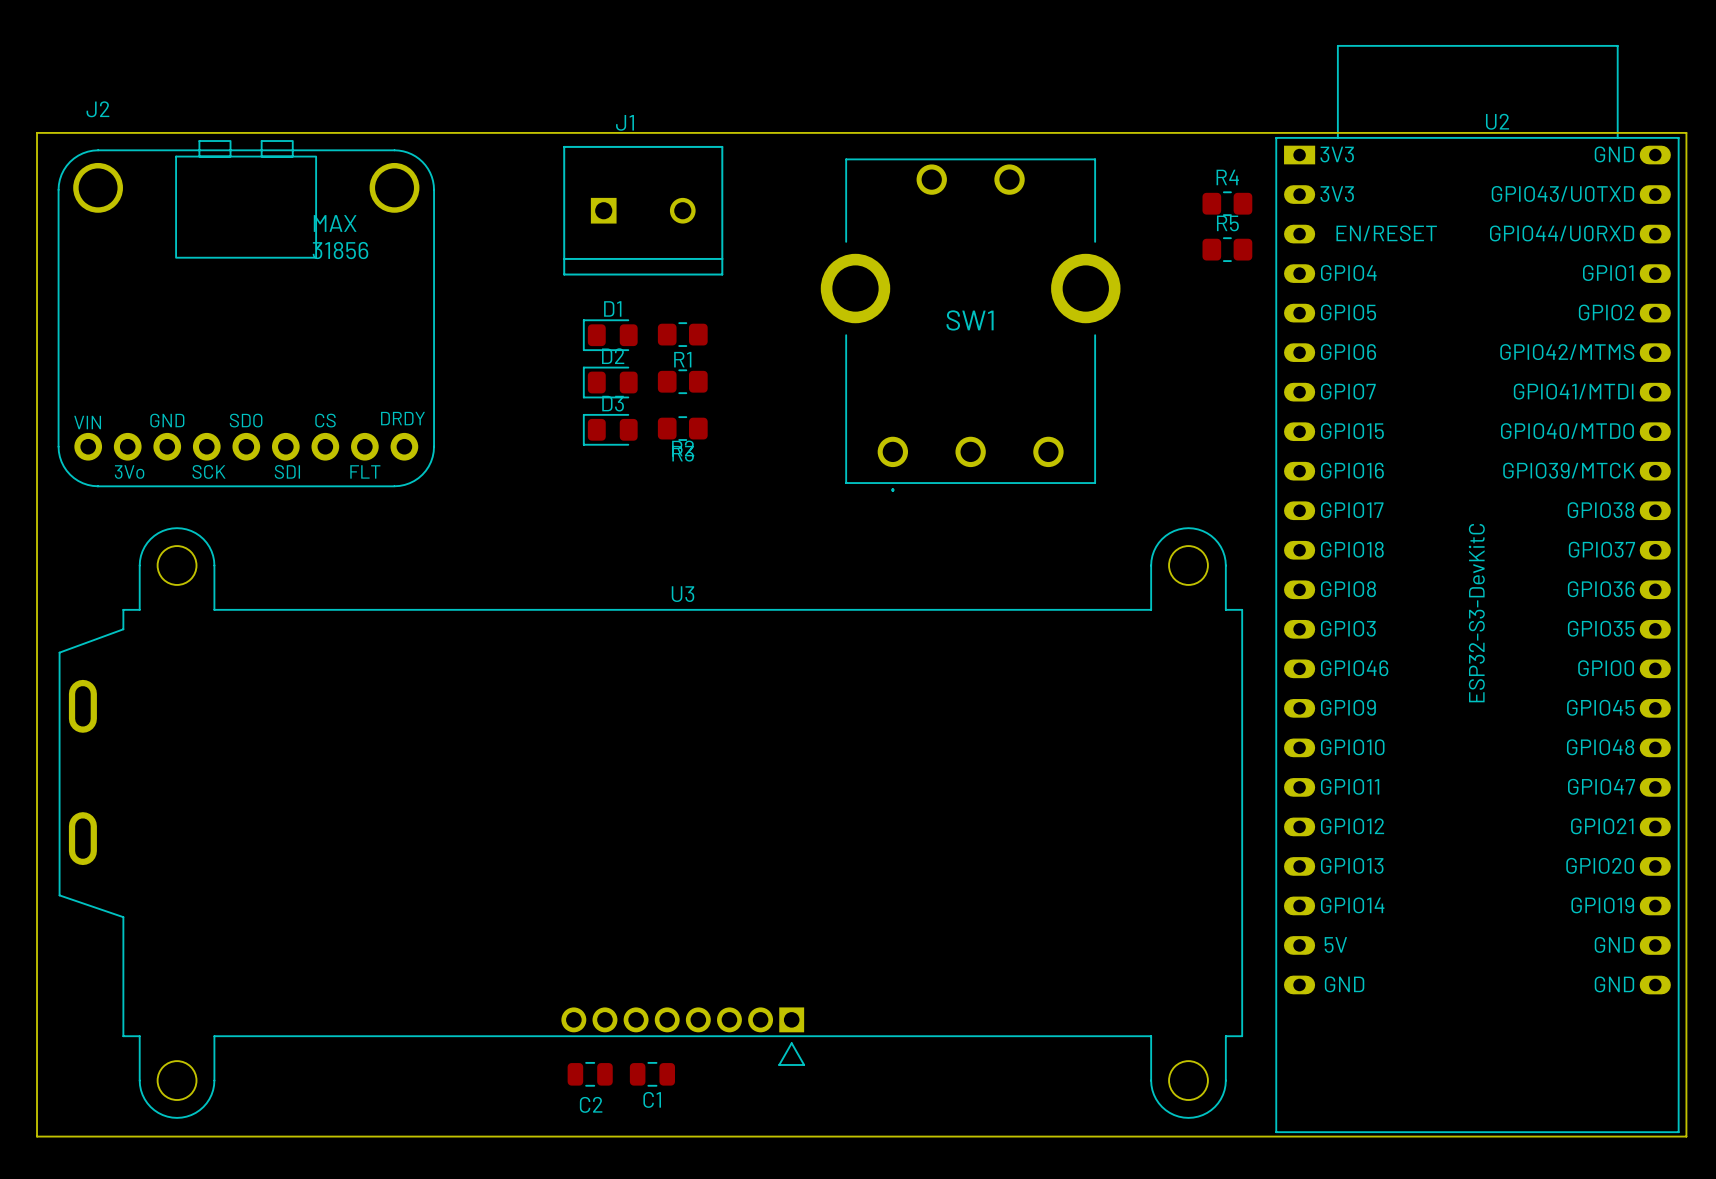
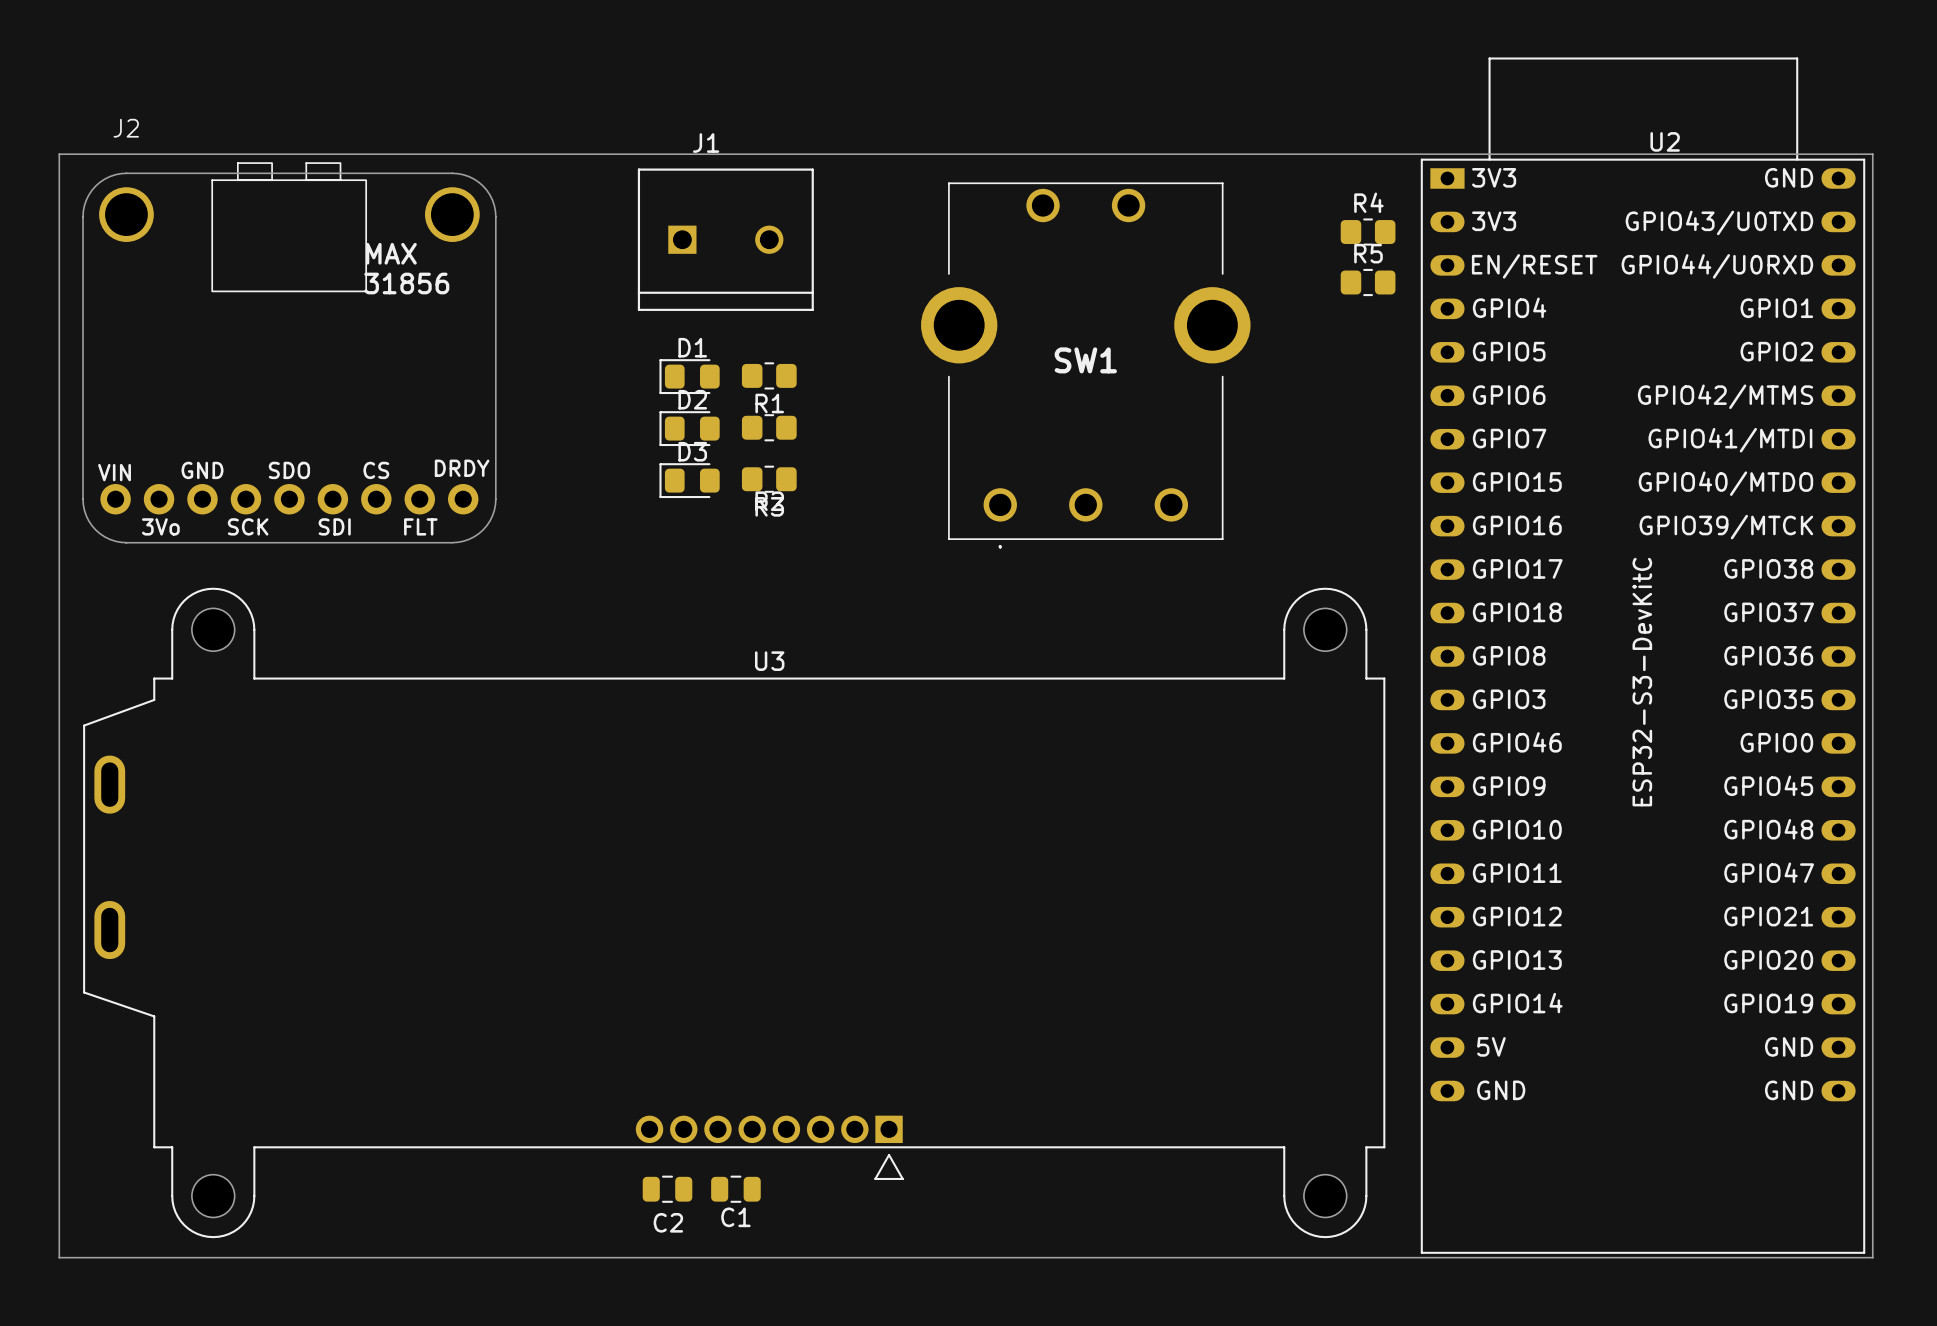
J2 footprint: [58, 140, 435, 487] -> [82, 162, 497, 544]

